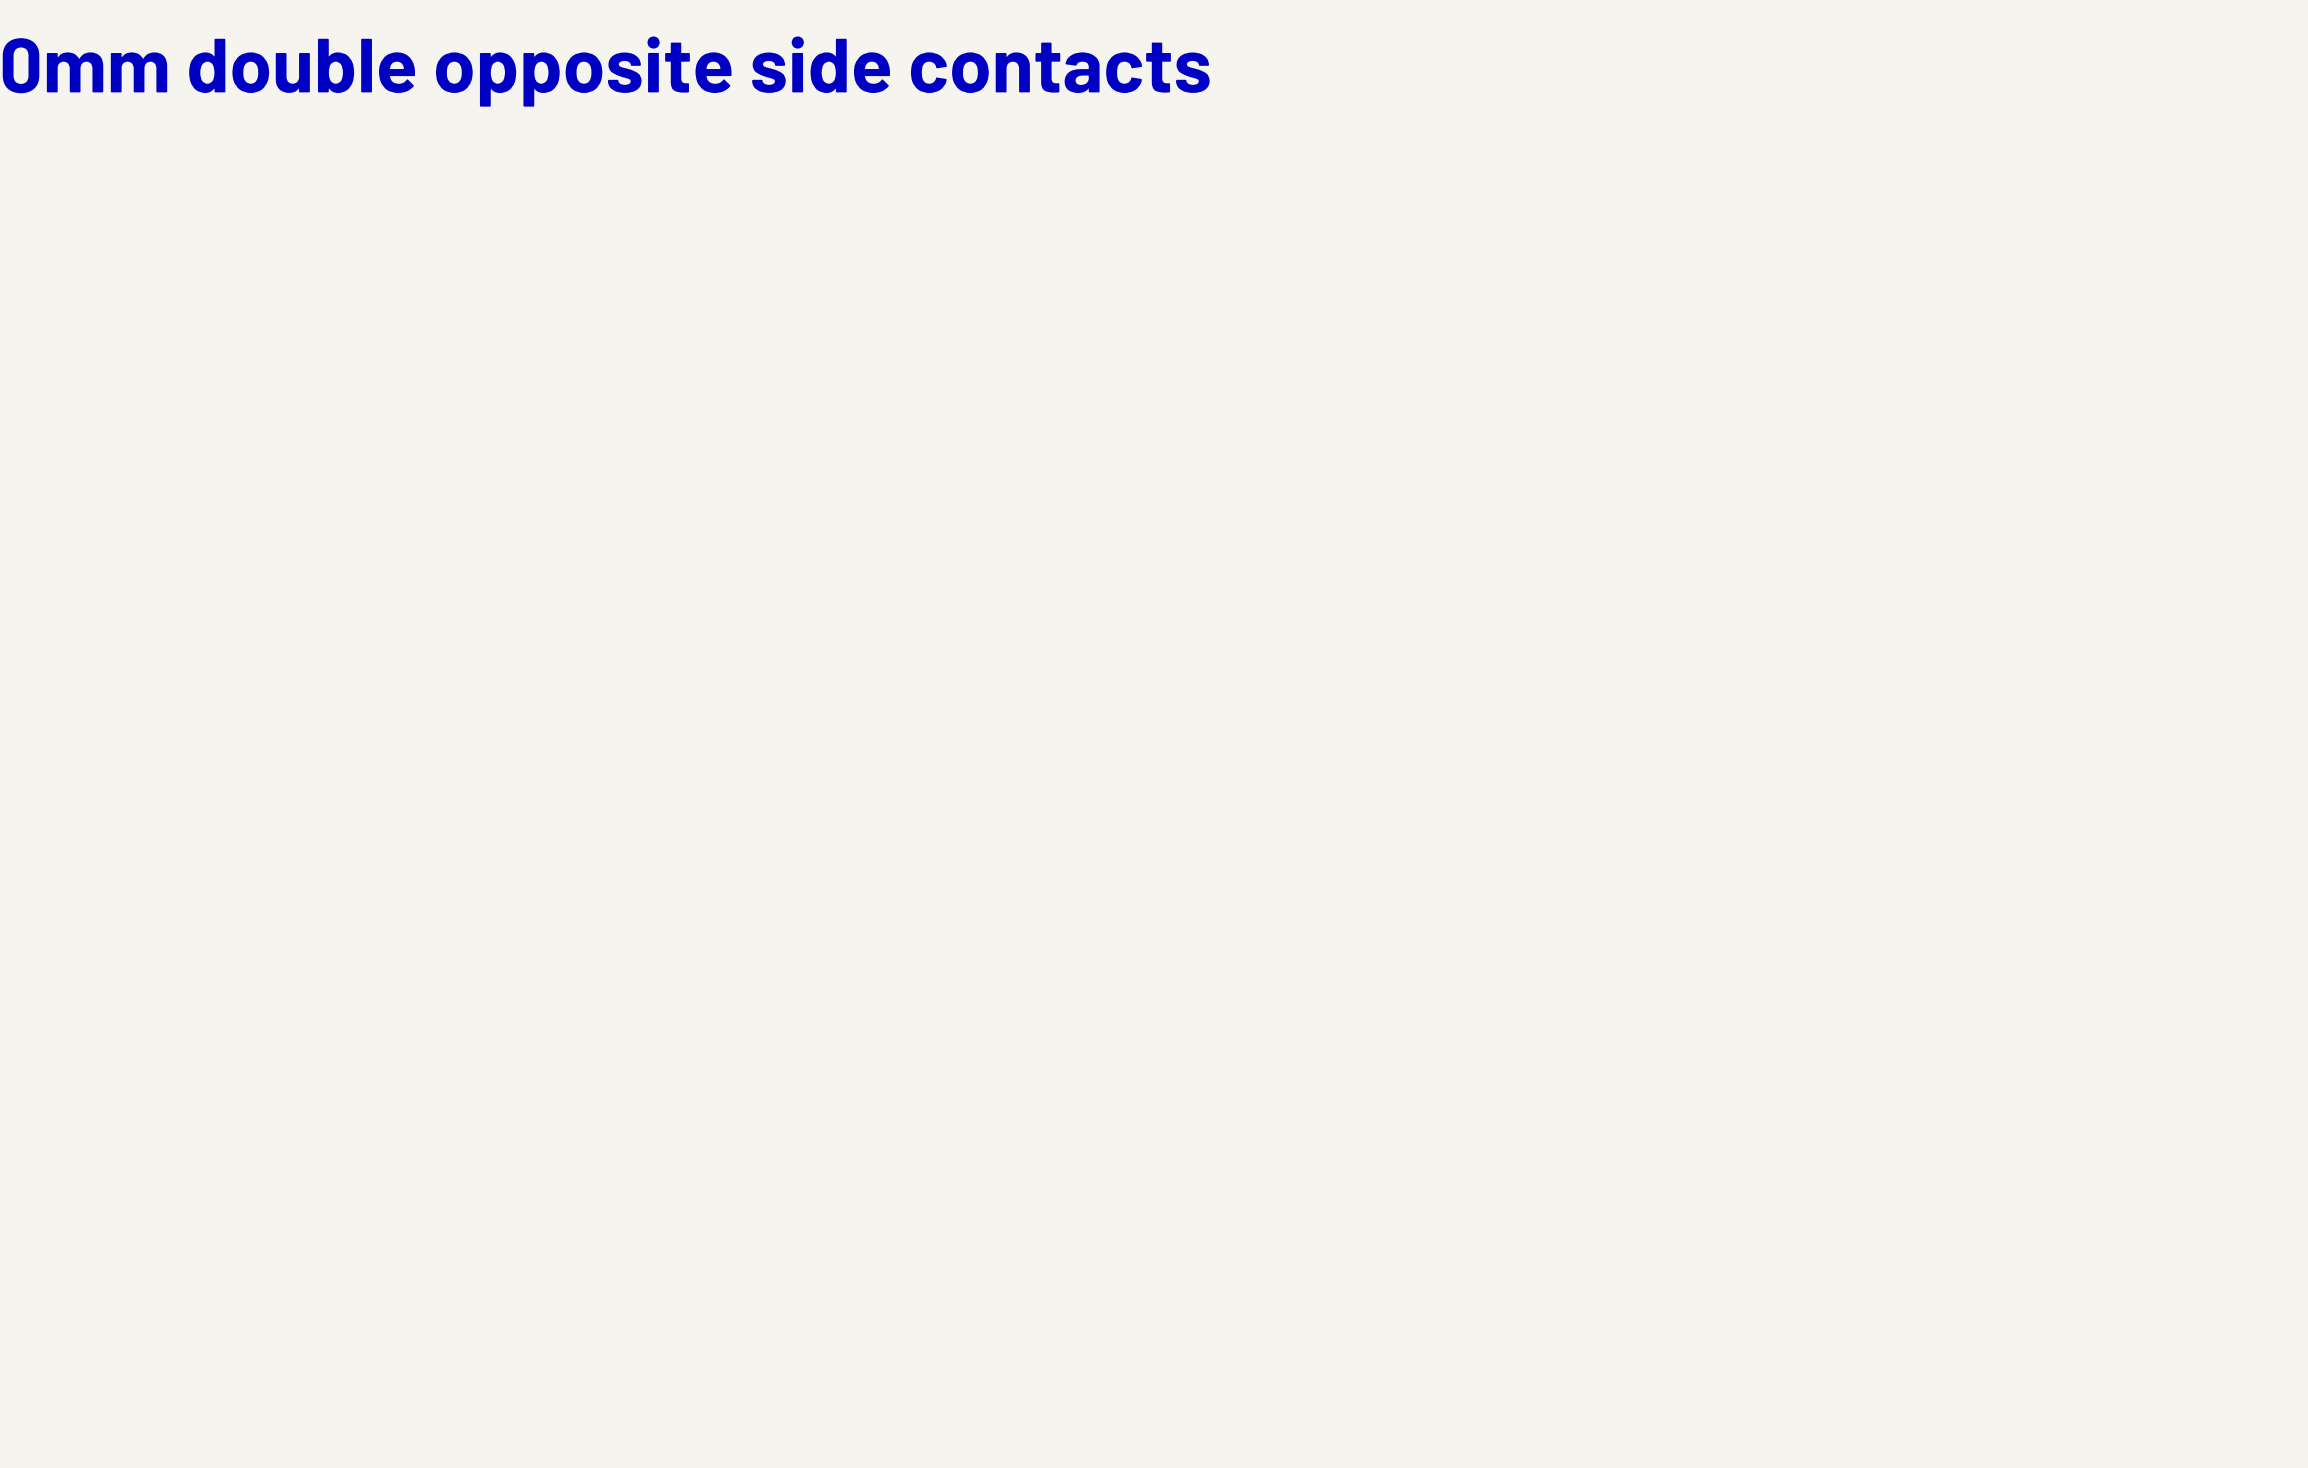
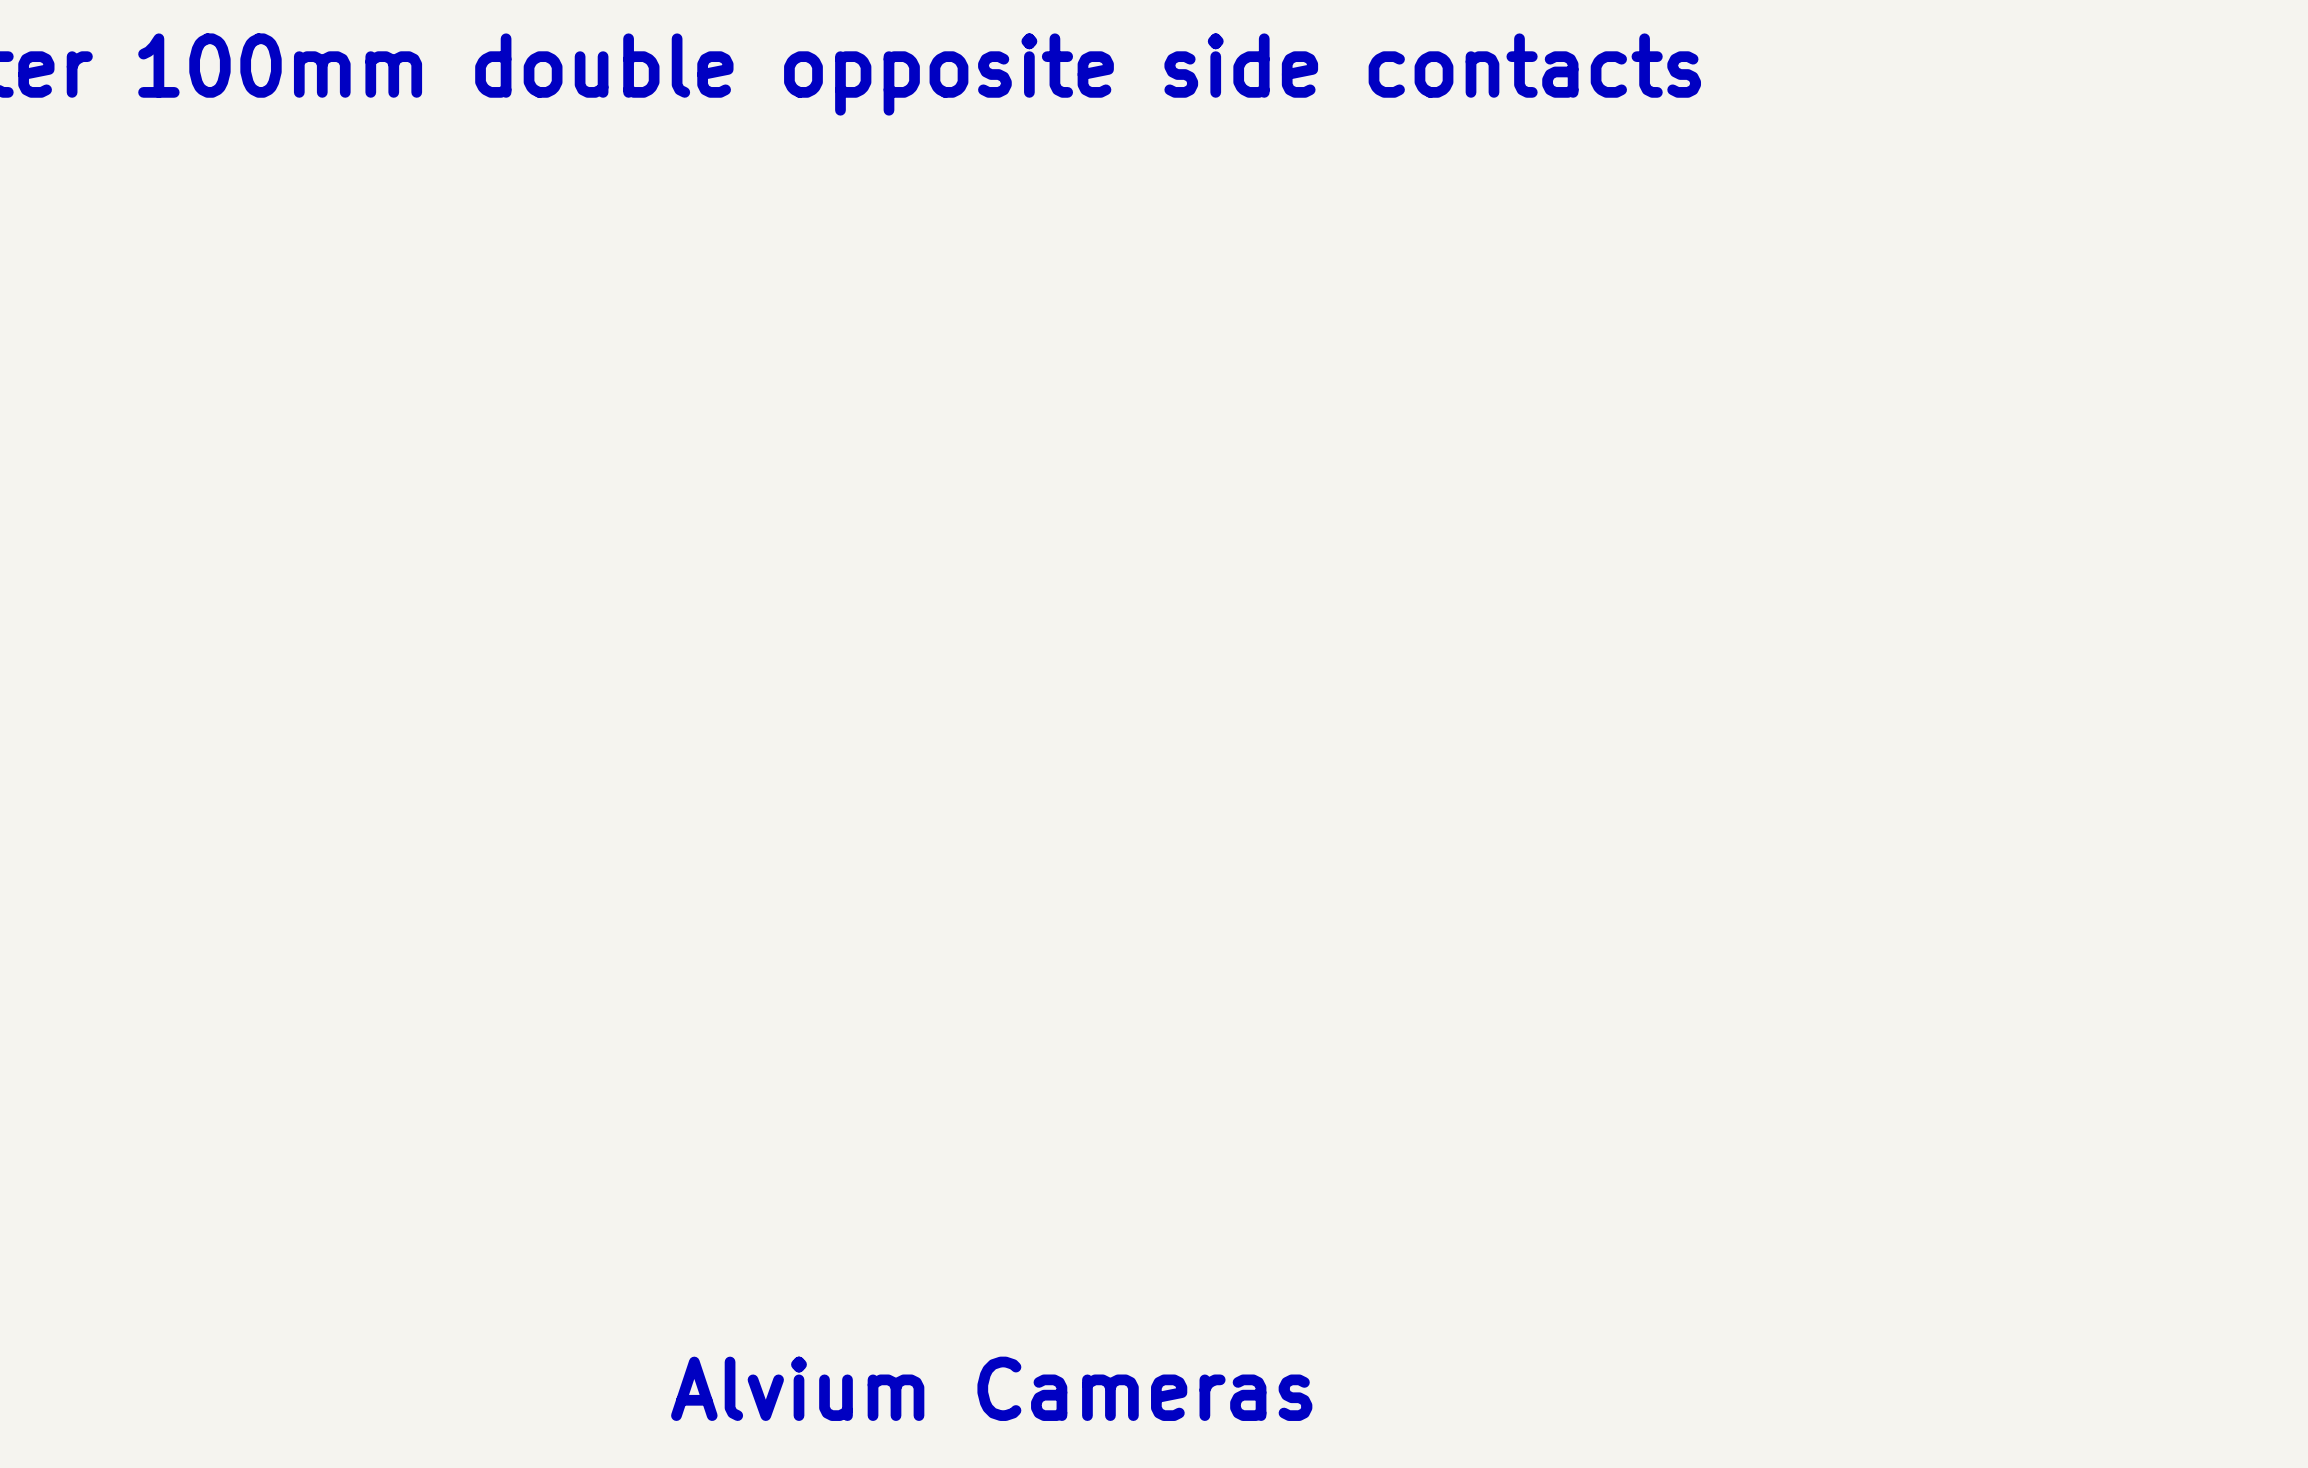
text: none -> Alvium Cameras (991, 1388)

